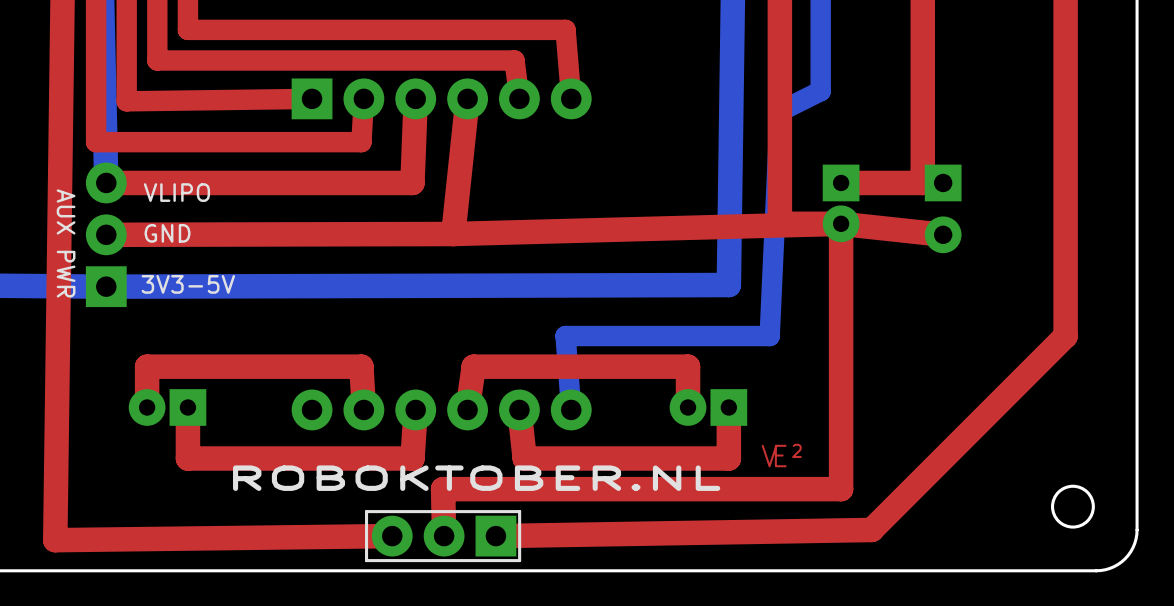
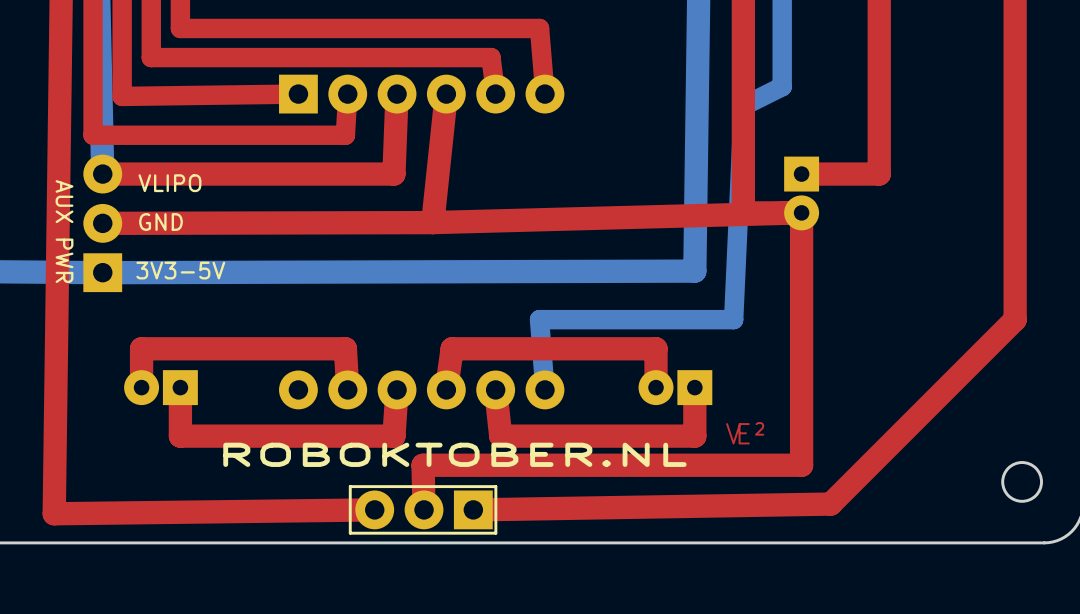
part: (943, 208) -> none
top track: (841, 223) (943, 234) -> none

